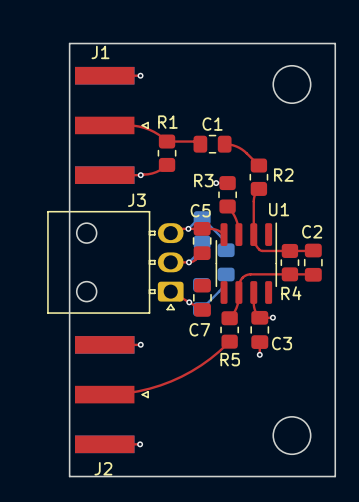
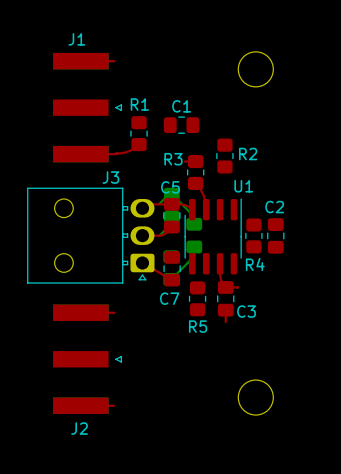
board edge: (69, 43) (335, 43) (335, 476) (69, 476) (69, 43) -> none
via: (140, 75) -> none
top track: (104, 125) (138, 126) (154, 131) (167, 141) (195, 141) (200, 144) -> none
top track: (224, 144) (241, 149) (258, 165) -> none
via: (140, 175) -> none
via: (216, 183) -> none
top track: (258, 188) (253, 199) (253, 236) (259, 249) (313, 250) -> none
via: (188, 228) -> none
via: (188, 262) -> none
top track: (313, 274) (245, 275) (239, 281) (237, 304) (229, 318) -> none
via: (189, 302) -> none
via: (272, 317) -> none
top track: (229, 341) (201, 365) (171, 381) (138, 391) (104, 394) -> none
via: (140, 344) -> none
via: (259, 354) -> none
via: (140, 444) -> none

